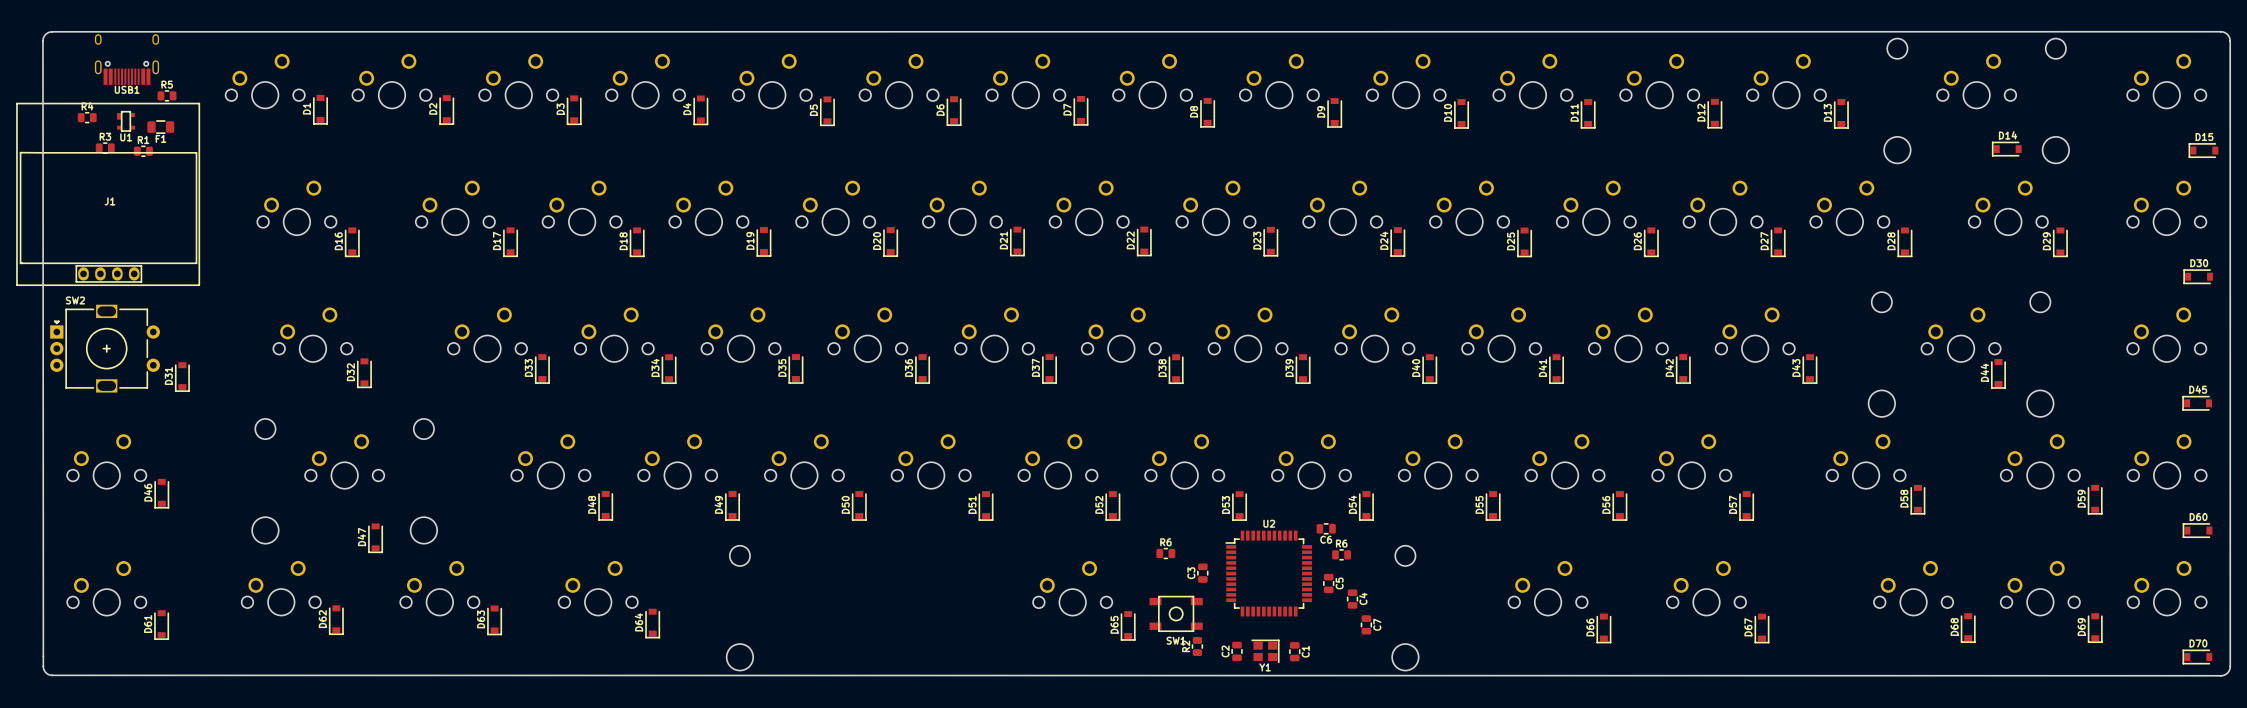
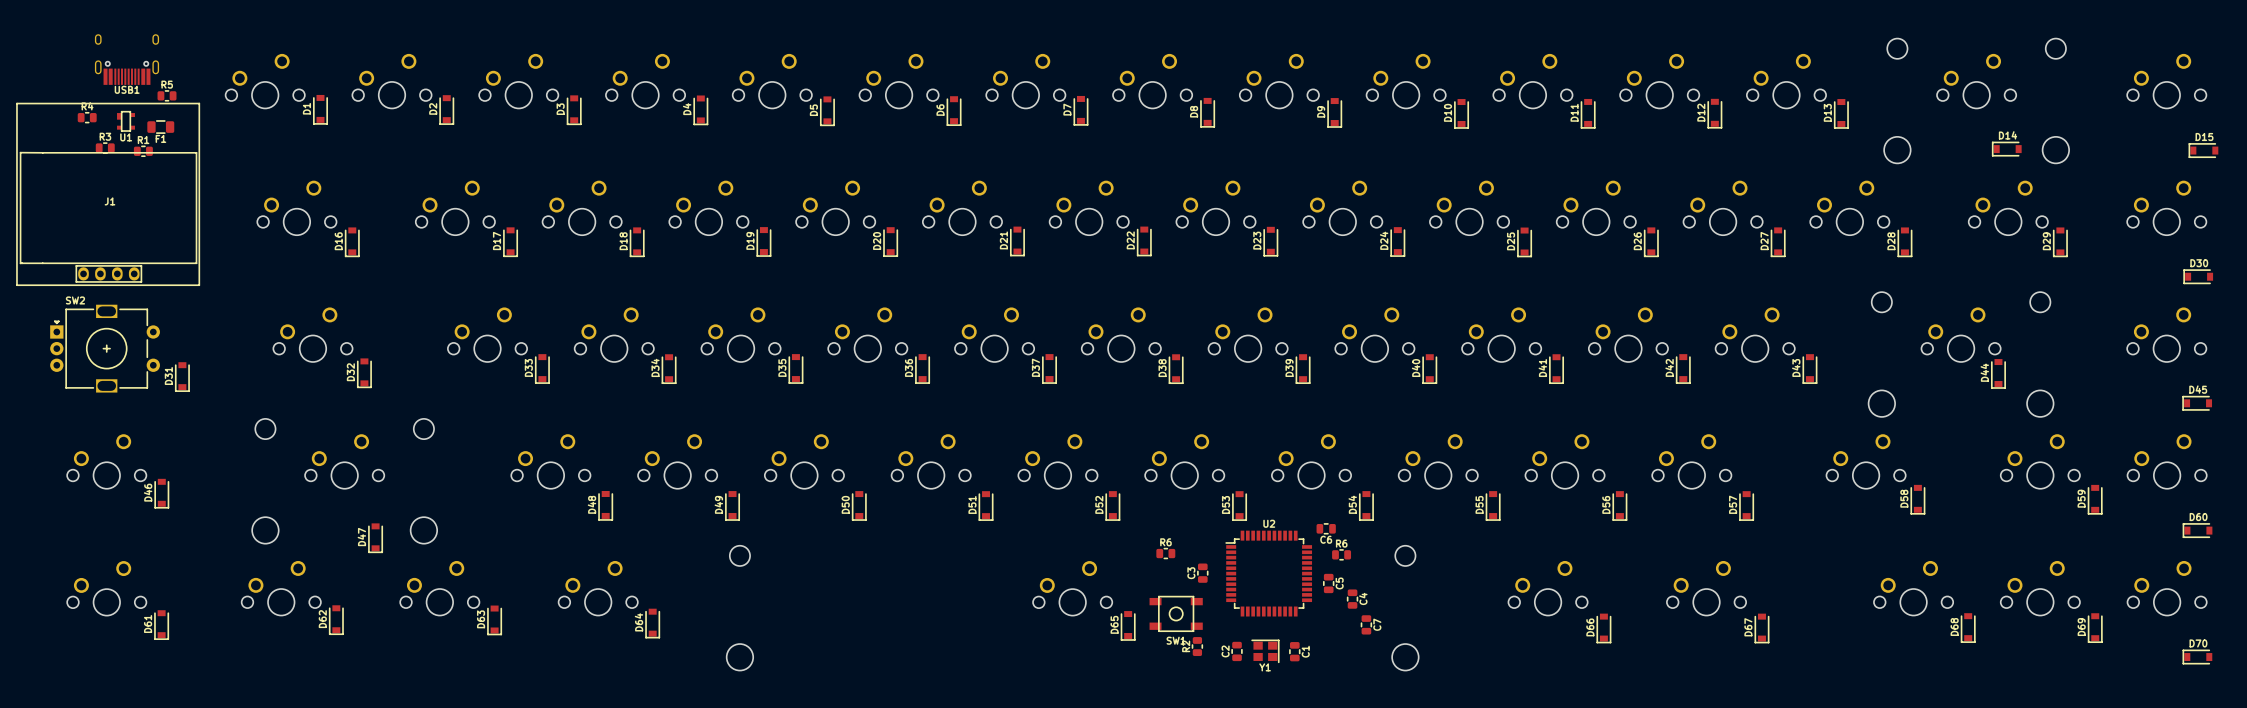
board edge: (52, 675) (45, 672) (43, 666) (42, 41) (44, 36) (49, 32) (2220, 31) (2226, 33) (2229, 38) (2230, 666) (2228, 672) (2223, 675) (52, 675) -> none

